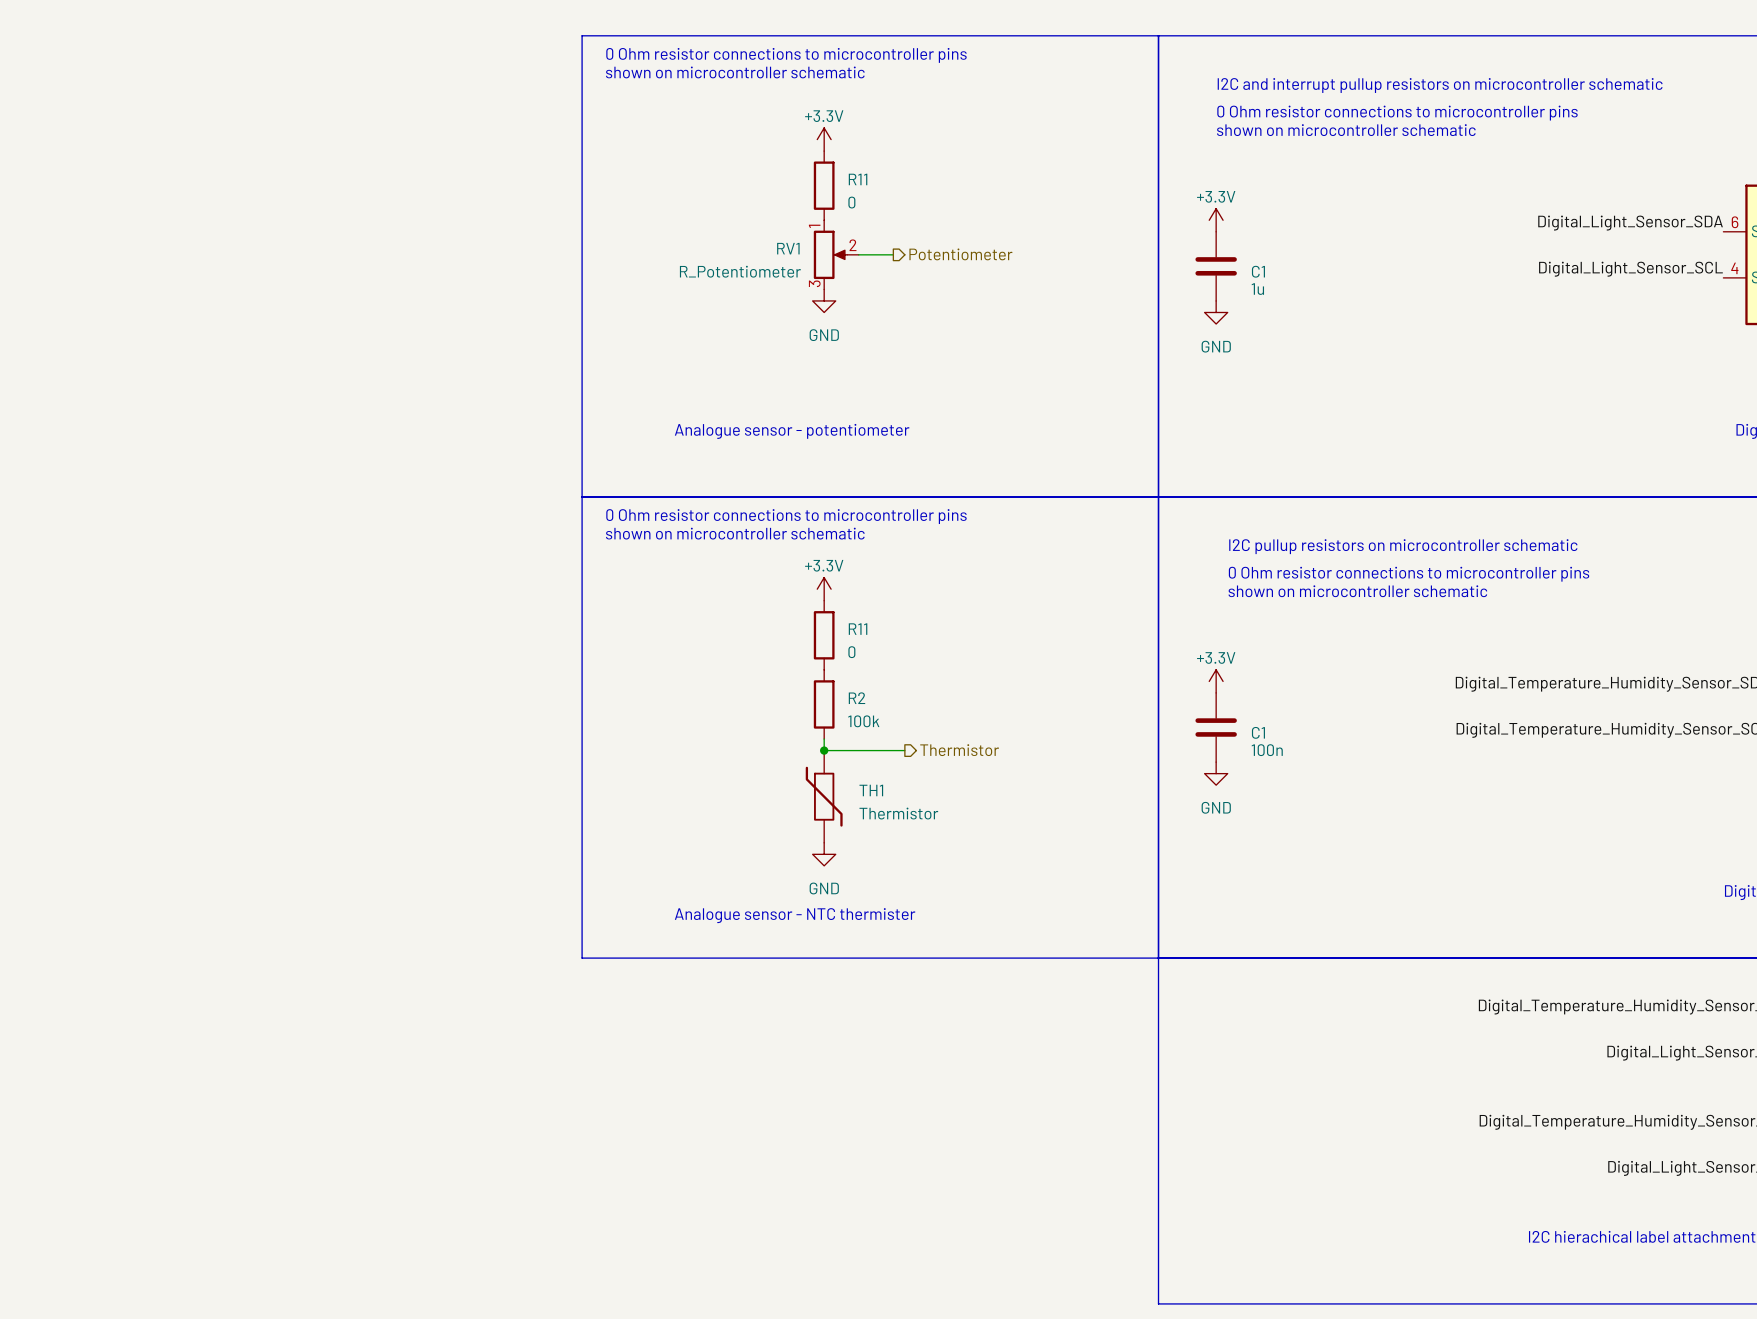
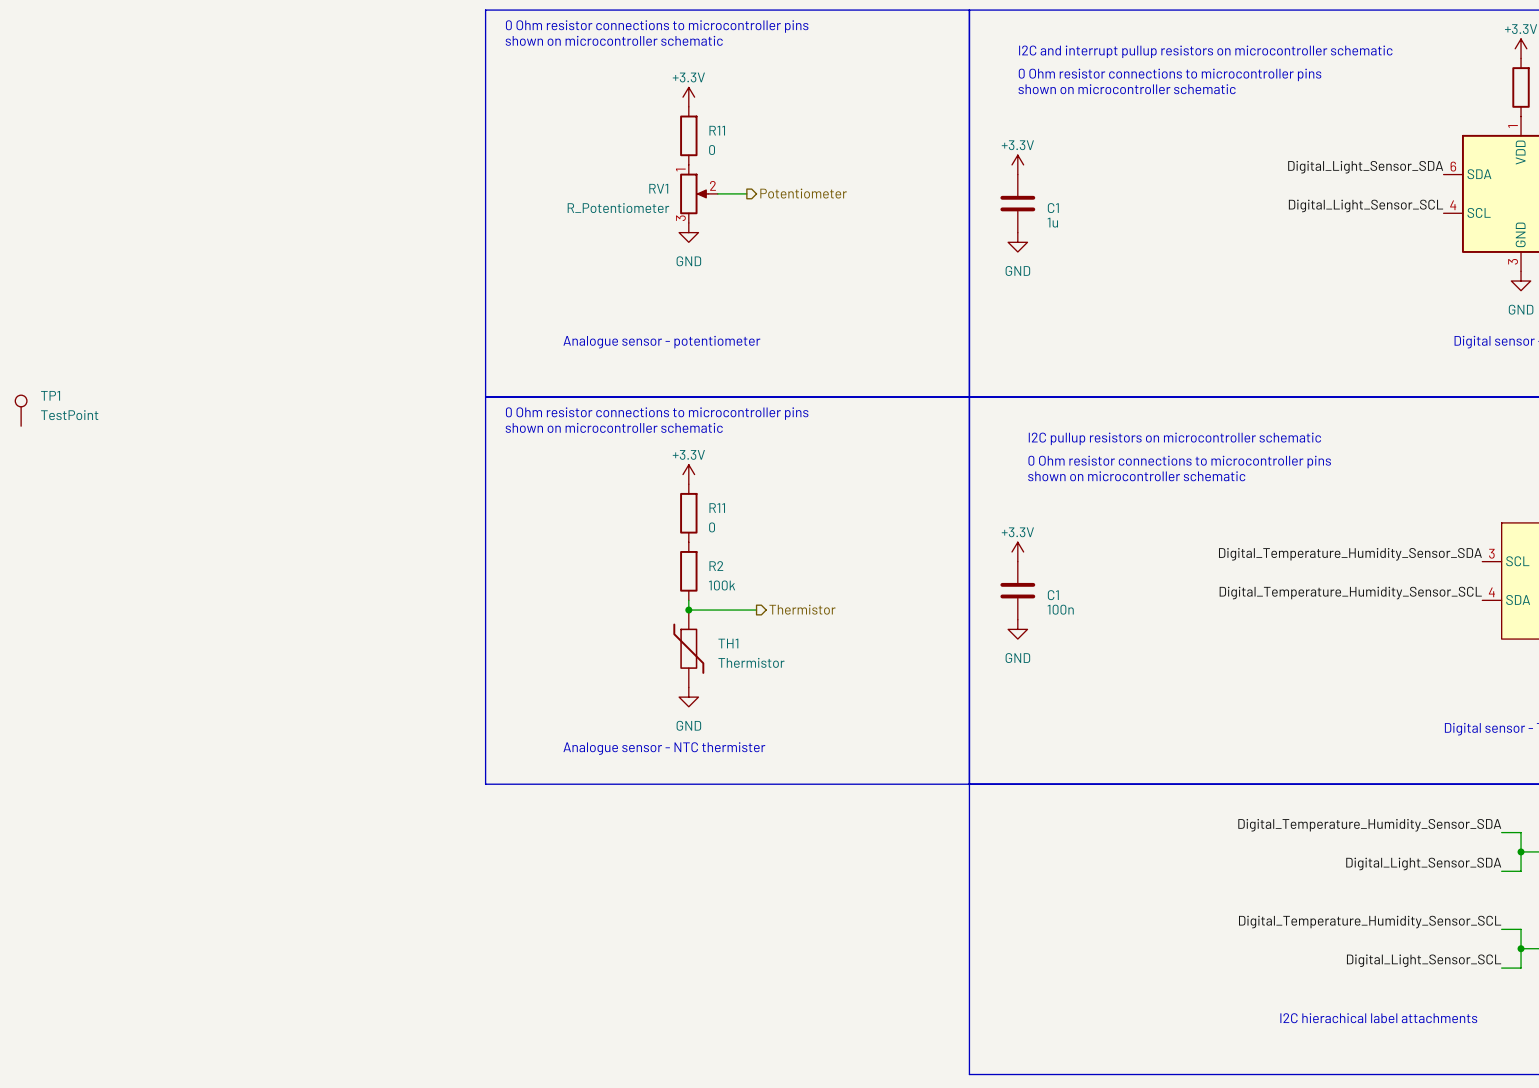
TP1: none -> TestPoint (21, 410)

